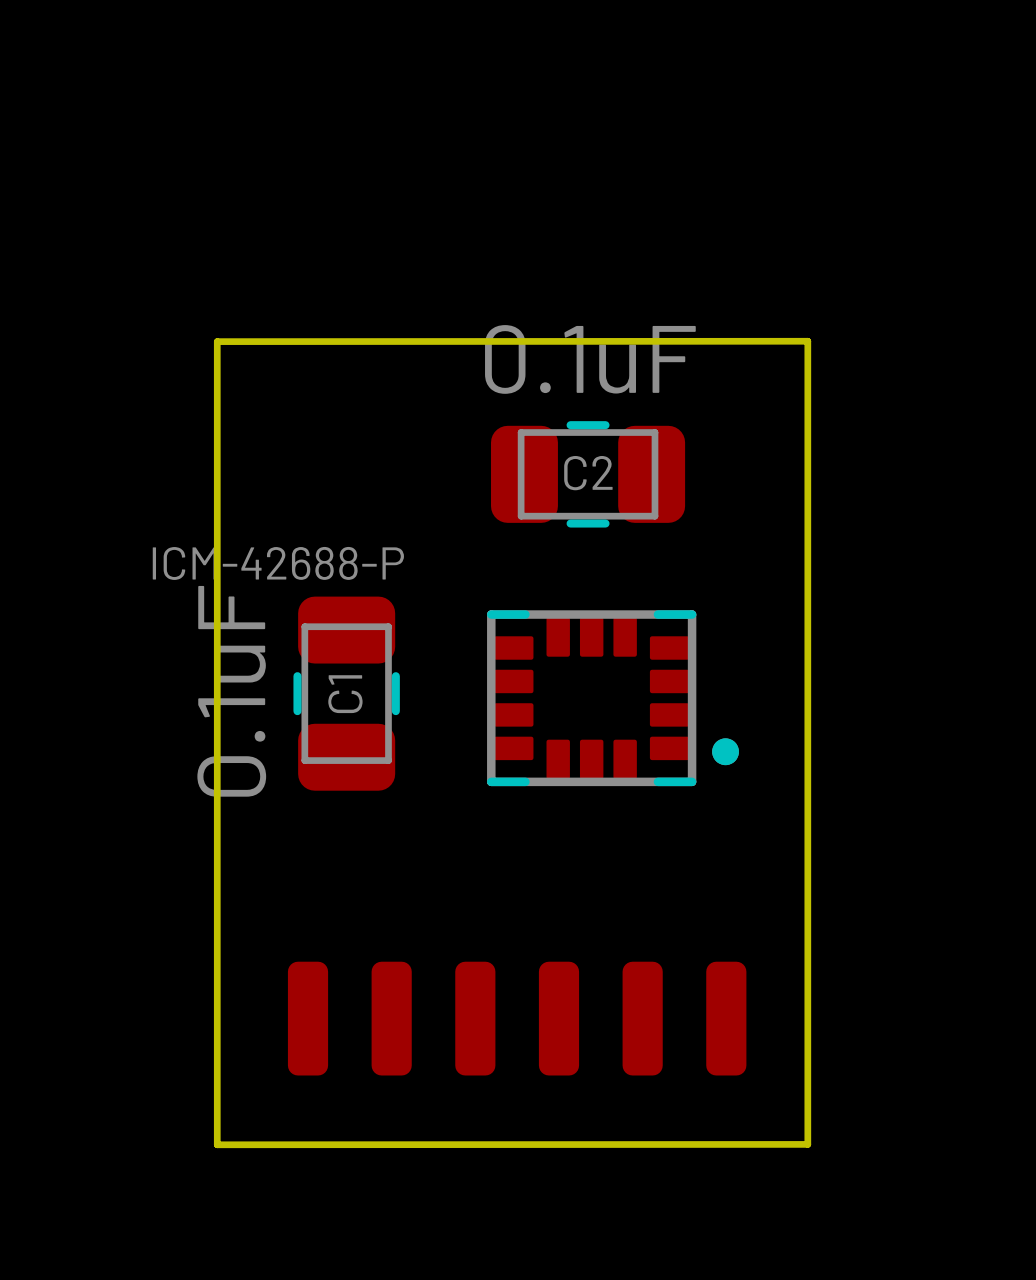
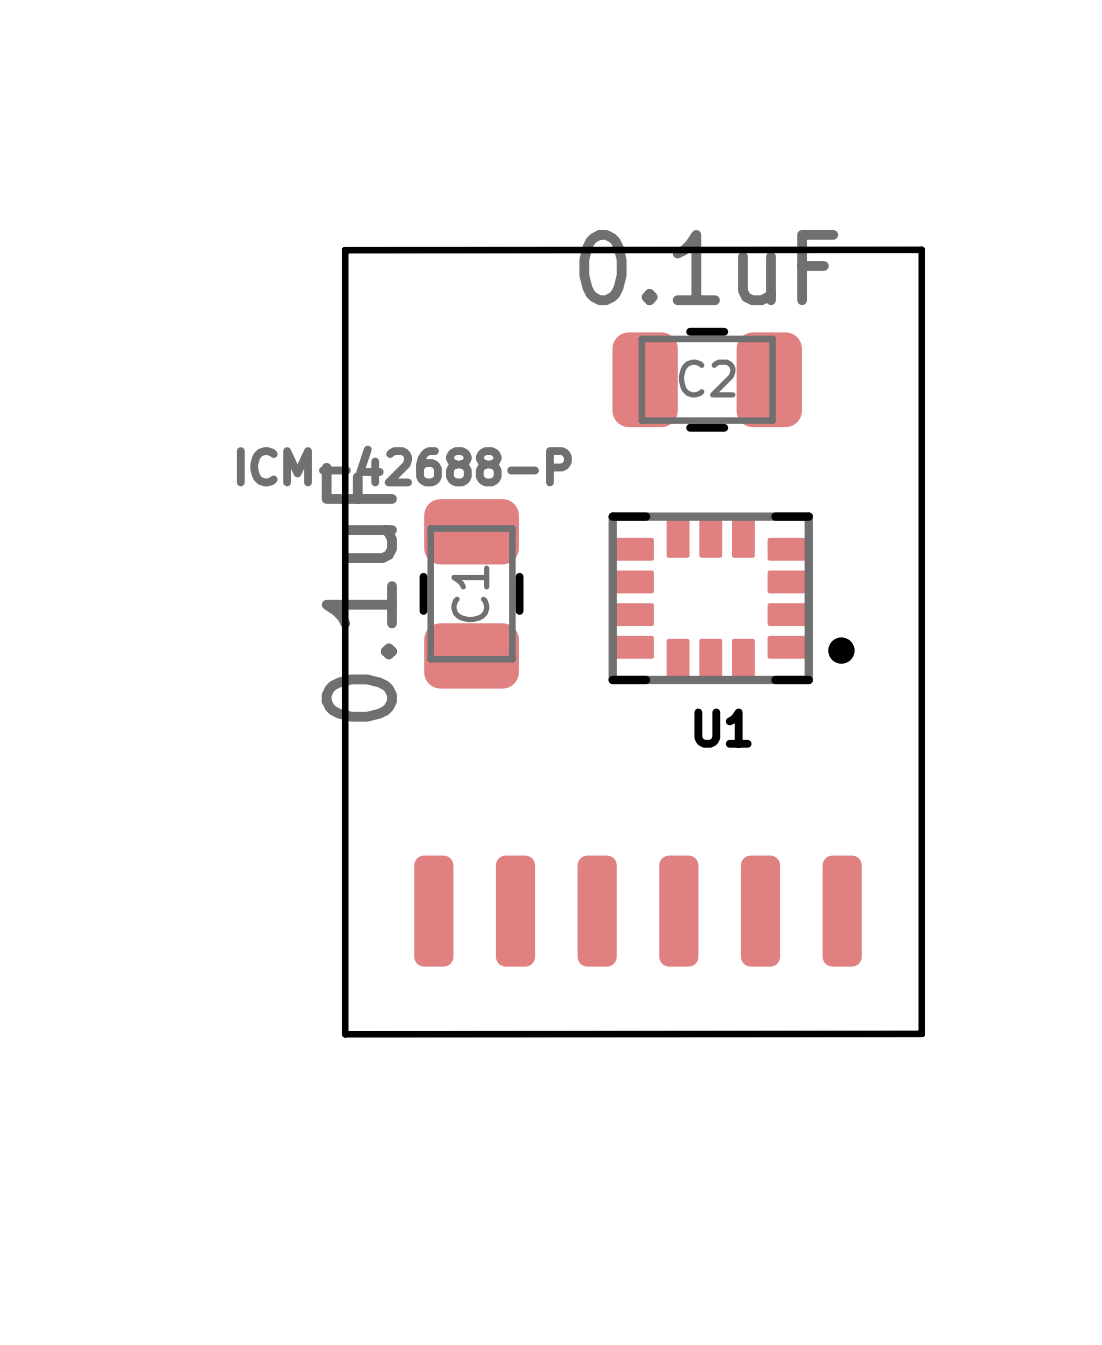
U1 name: none -> U1 (722, 728)

